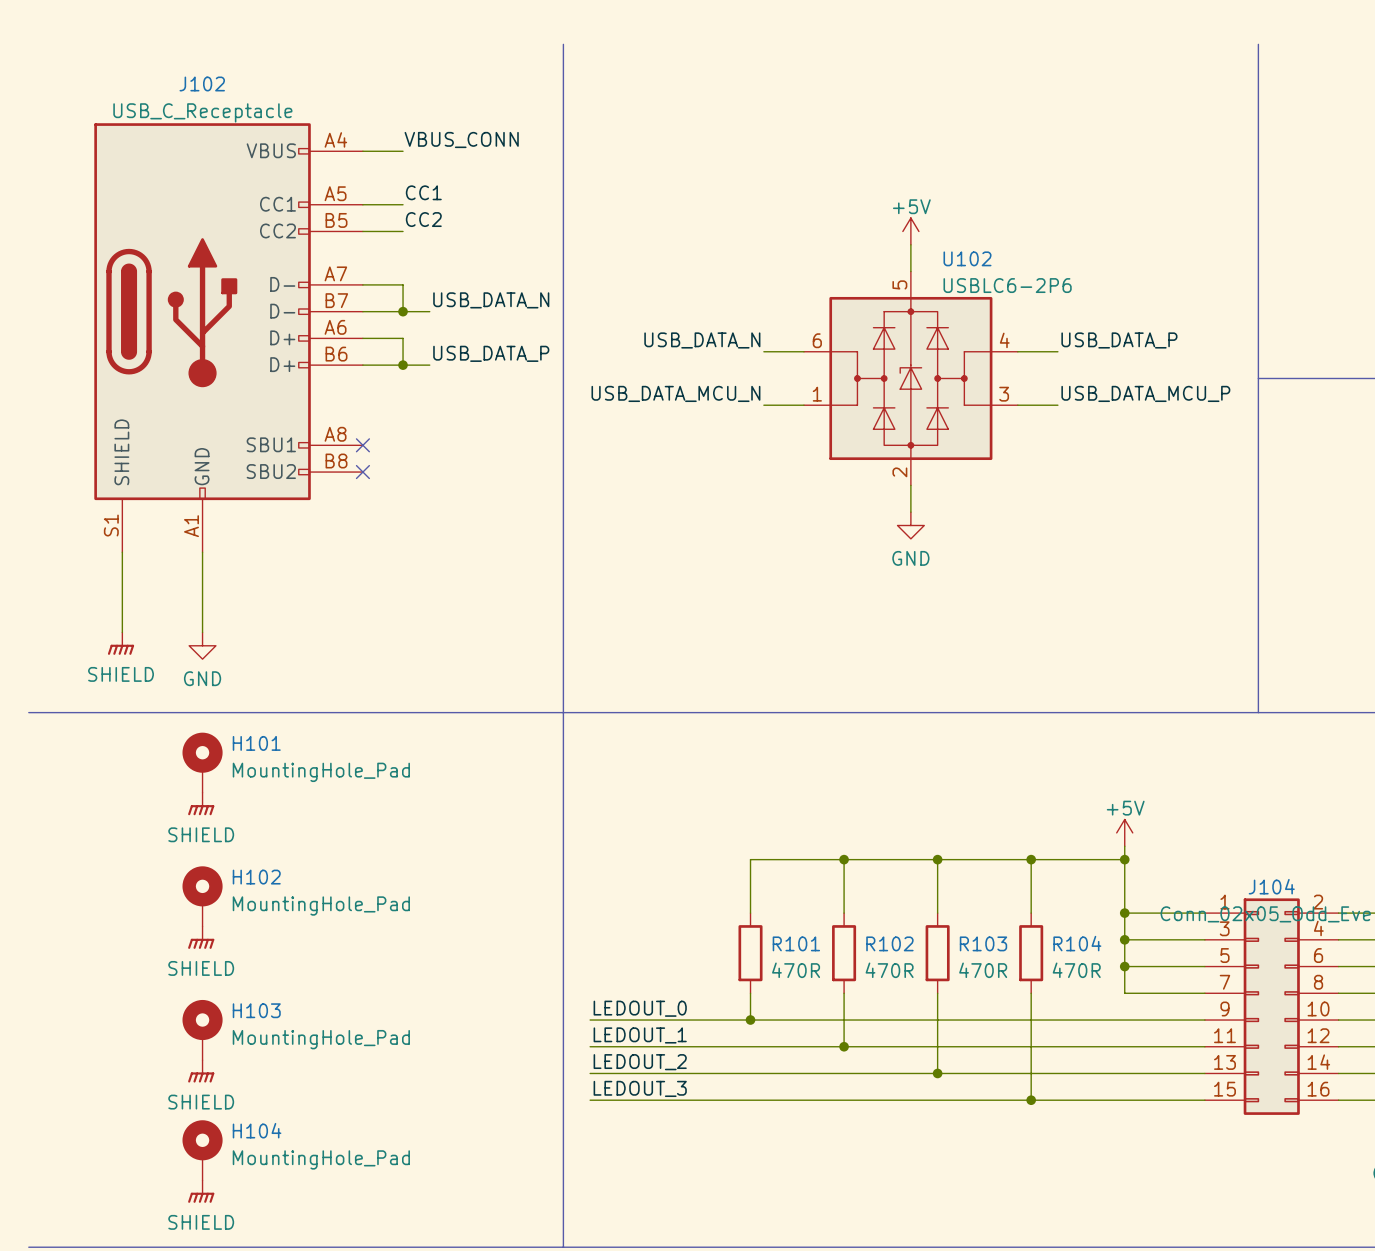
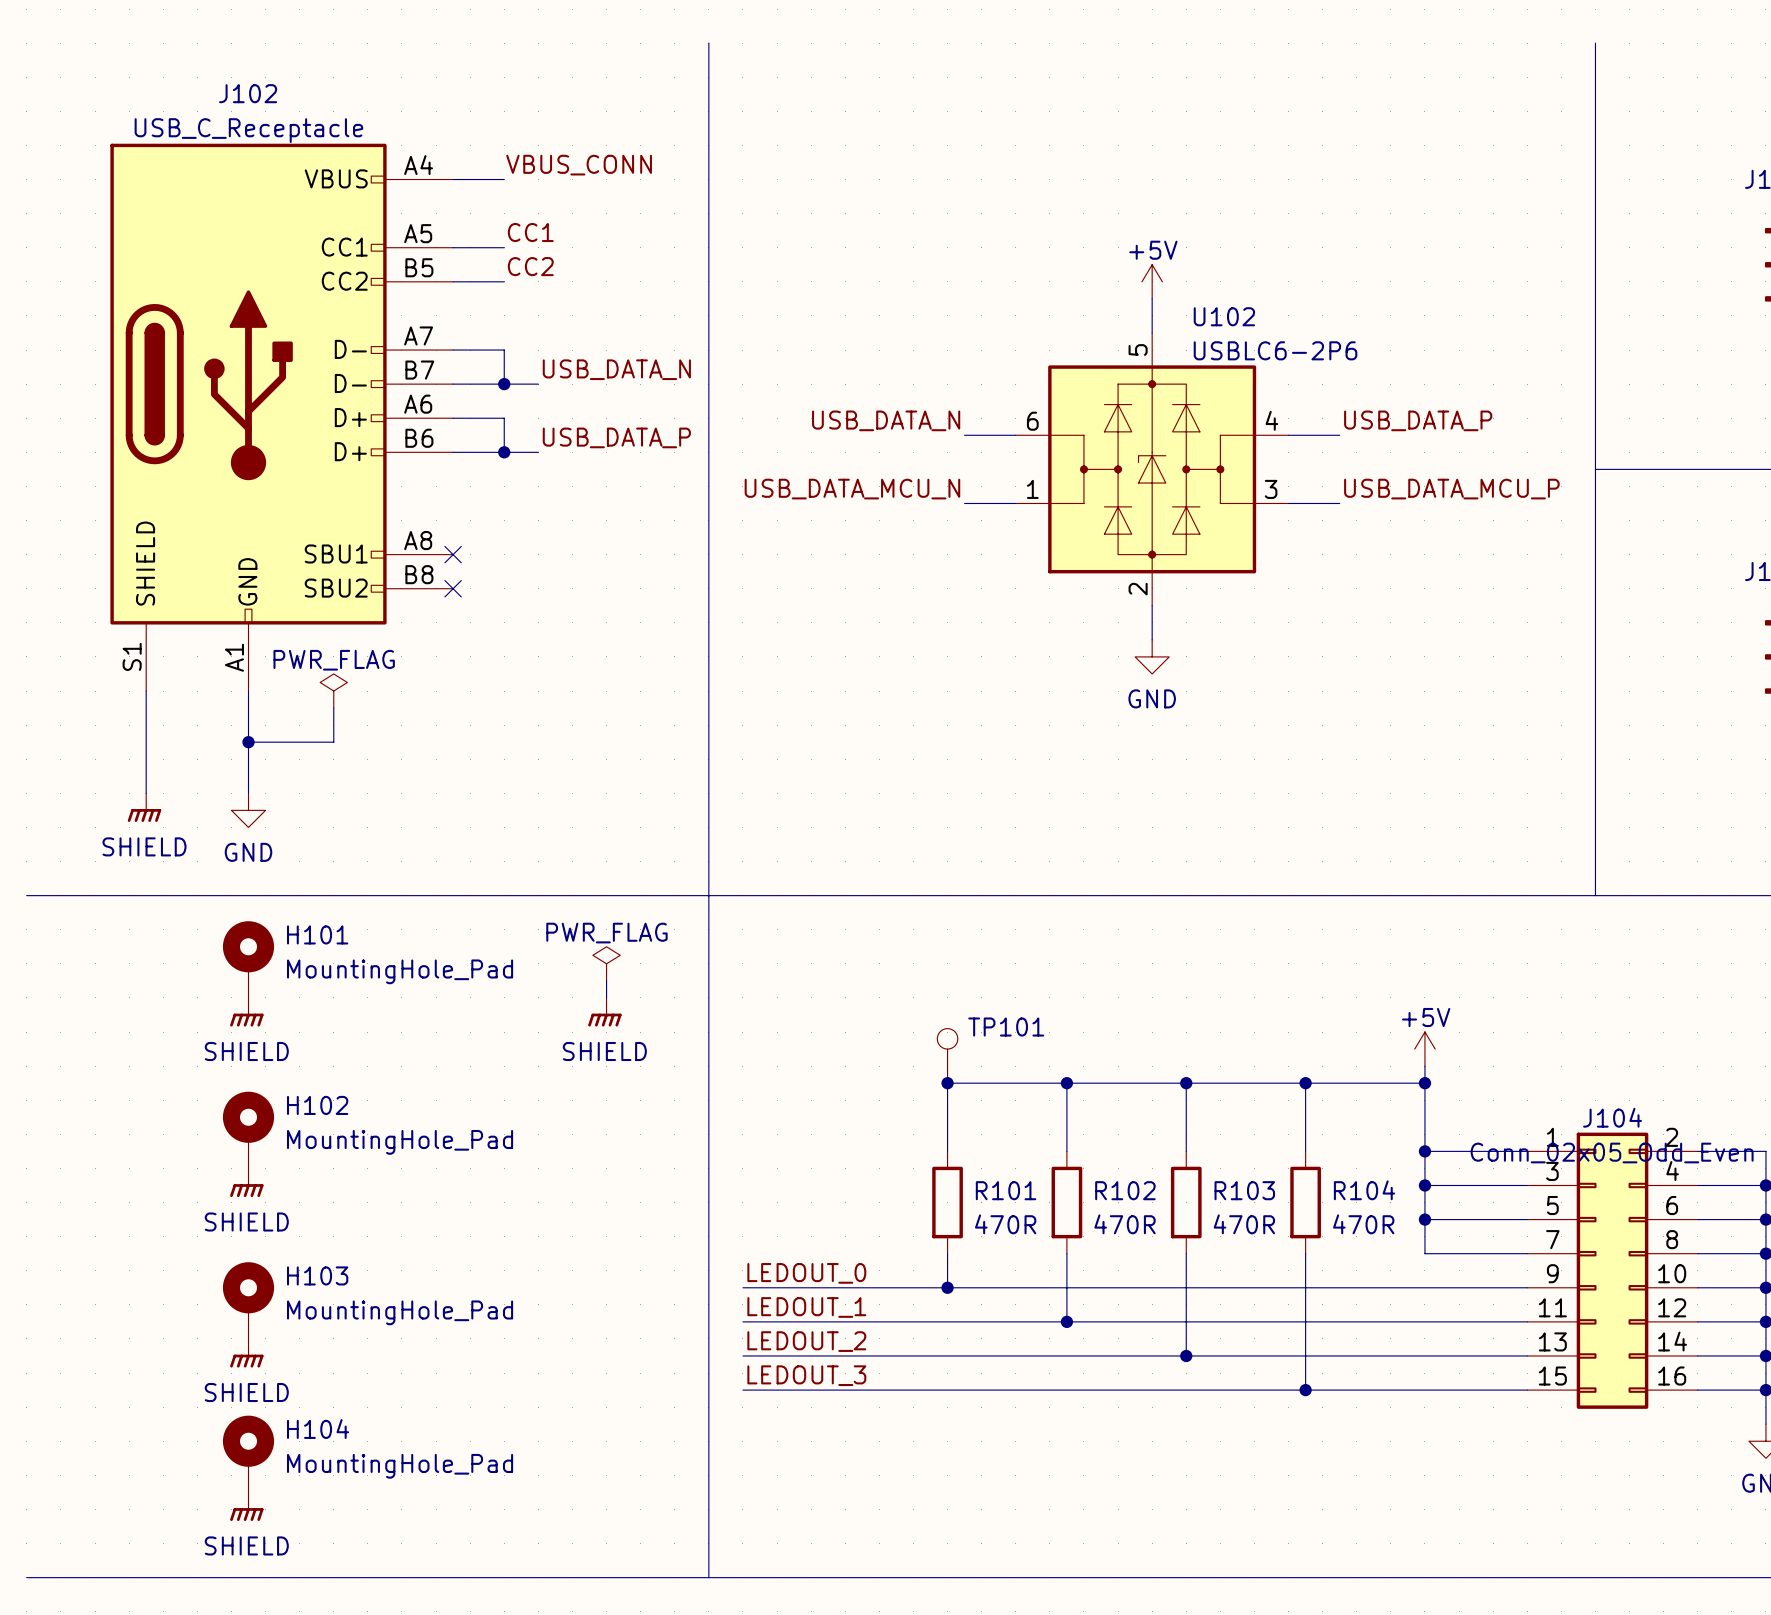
power symbol: none -> PWR_FLAG (333, 691)
wire: none -> (333, 708) (333, 742) (248, 742)
junction: none -> (248, 742)
power symbol: none -> PWR_FLAG (606, 963)
wire: none -> (606, 980) (606, 997)
power symbol: none -> SHIELD (604, 1012)
TP101: none -> (947, 1055)
junction: none -> (947, 1083)

